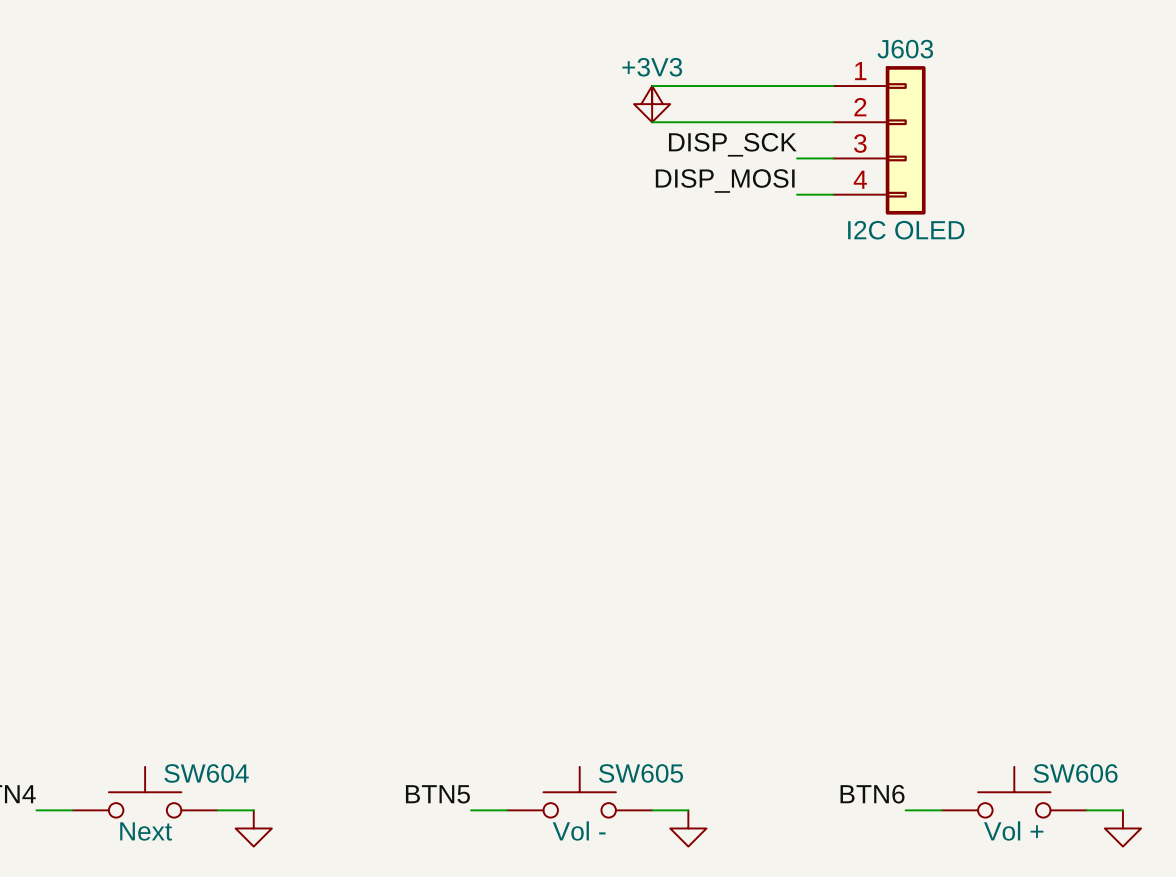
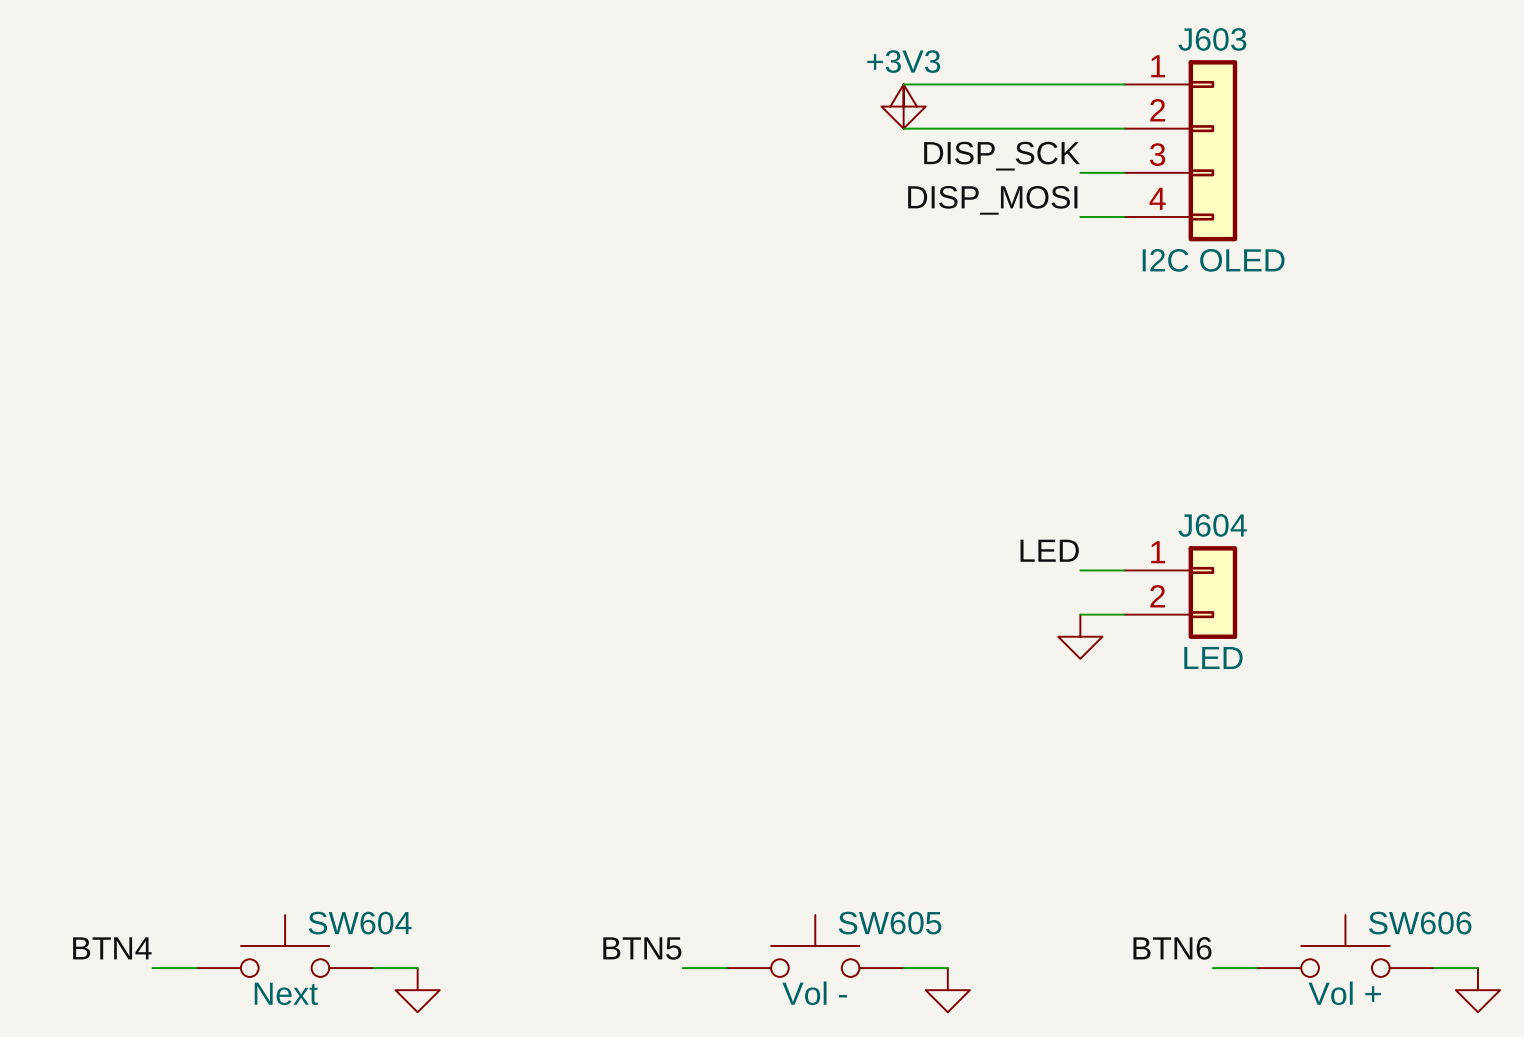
label: none -> LED (1049, 550)
wire: none -> (1080, 570) (1124, 570)
J604: none -> LED (1180, 592)
wire: none -> (1080, 614) (1124, 614)
power symbol: none -> (1080, 636)

